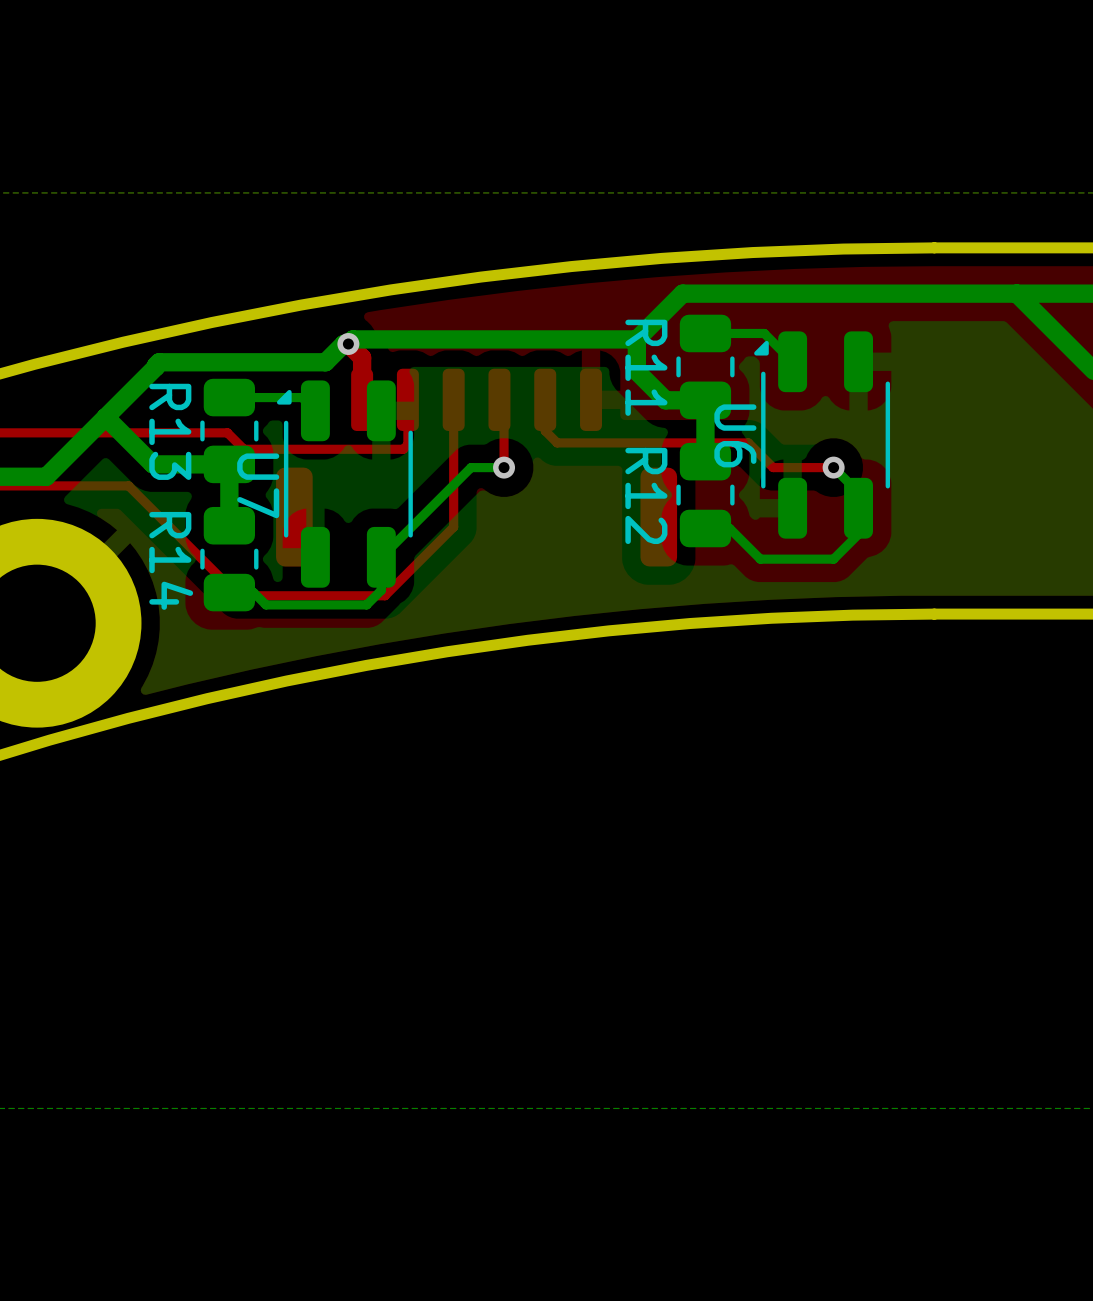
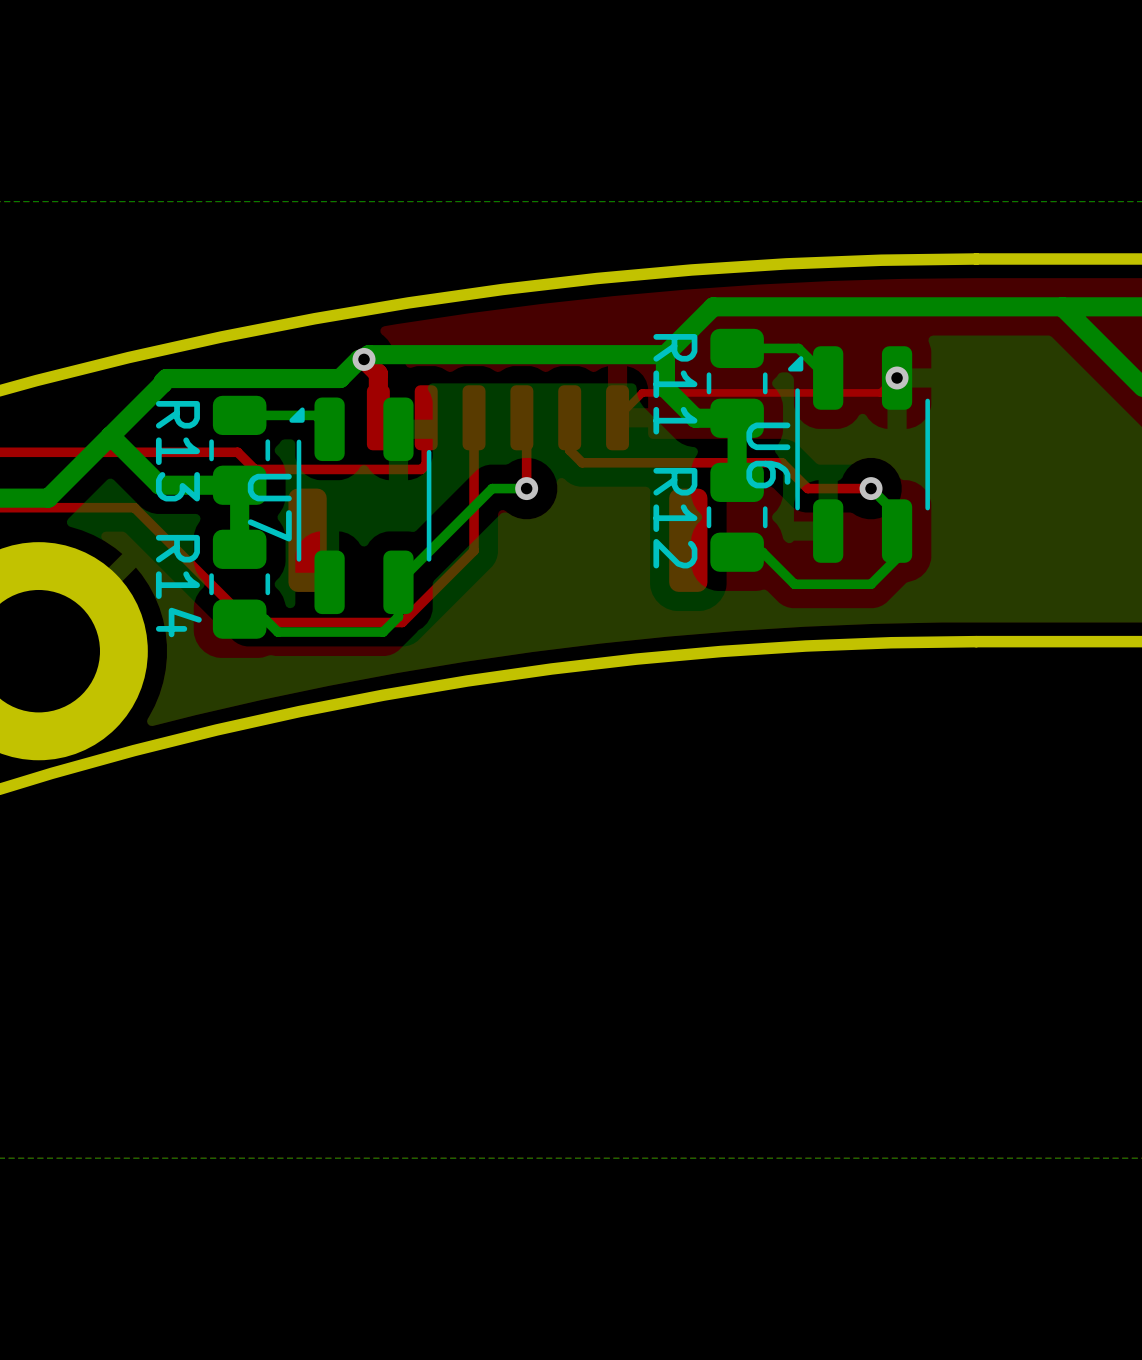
top track: none -> (897, 377) (880, 392) (642, 392) (617, 417)
via: none -> (897, 377)

